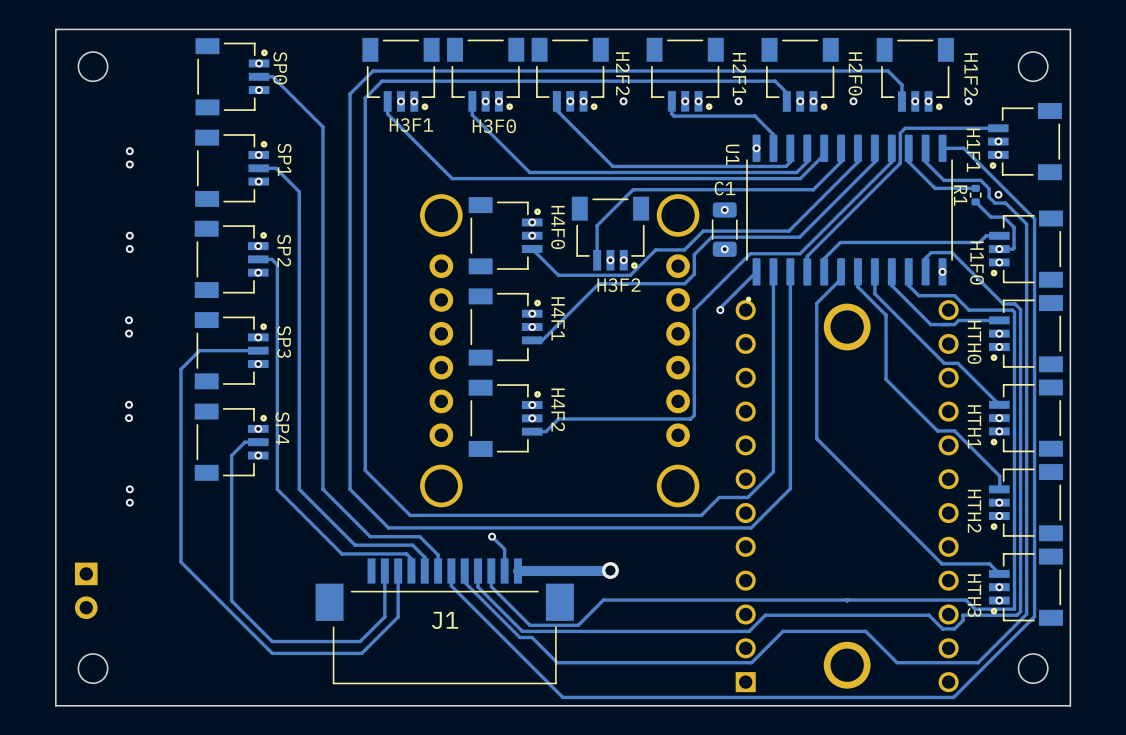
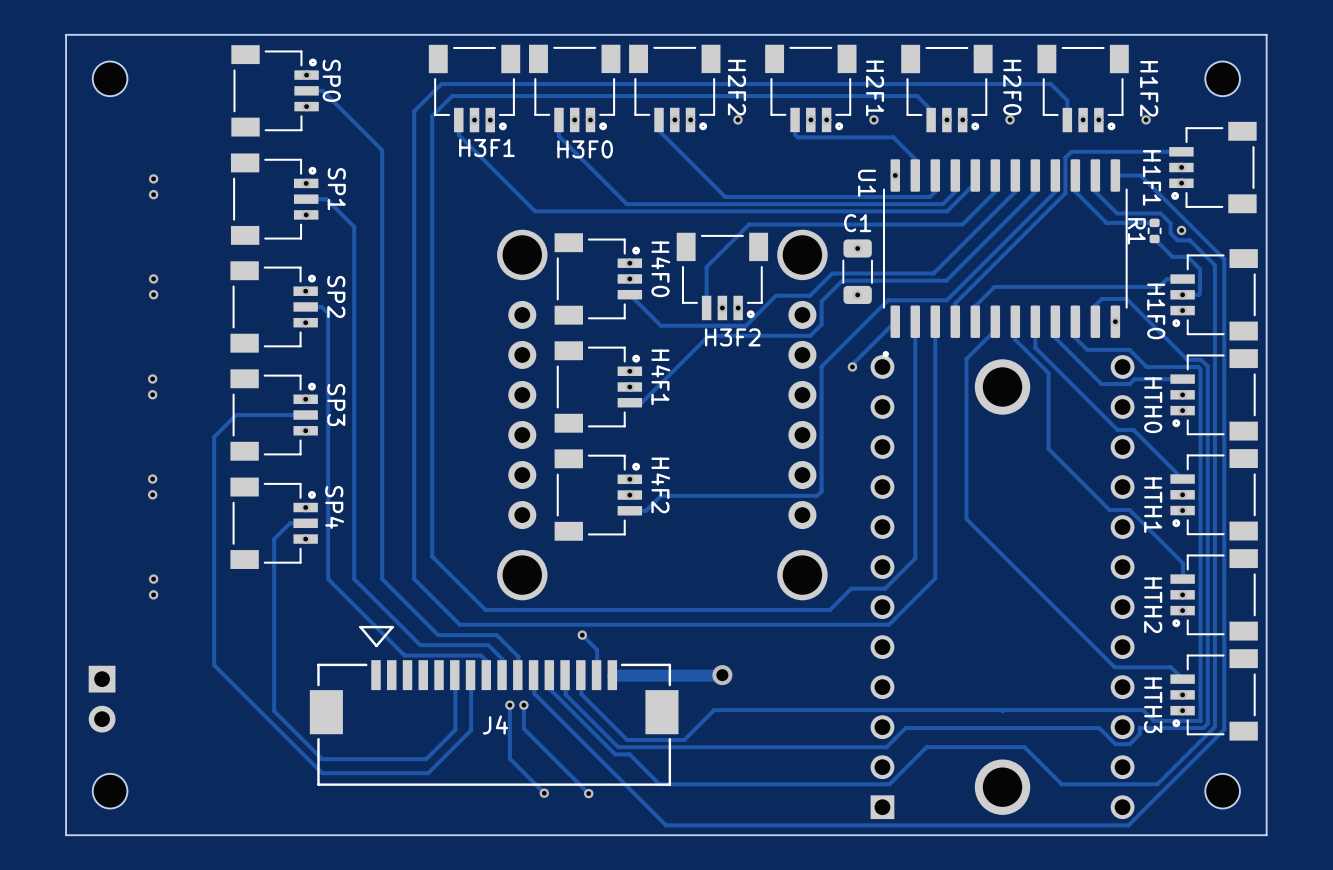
track: none -> (509, 705) (509, 758) (544, 793)
via: none -> (509, 705)
track: none -> (523, 705) (523, 728) (588, 793)
via: none -> (523, 705)
J4: none -> (494, 705)
J1: (444, 621) -> none
via: none -> (544, 793)
via: none -> (588, 793)

